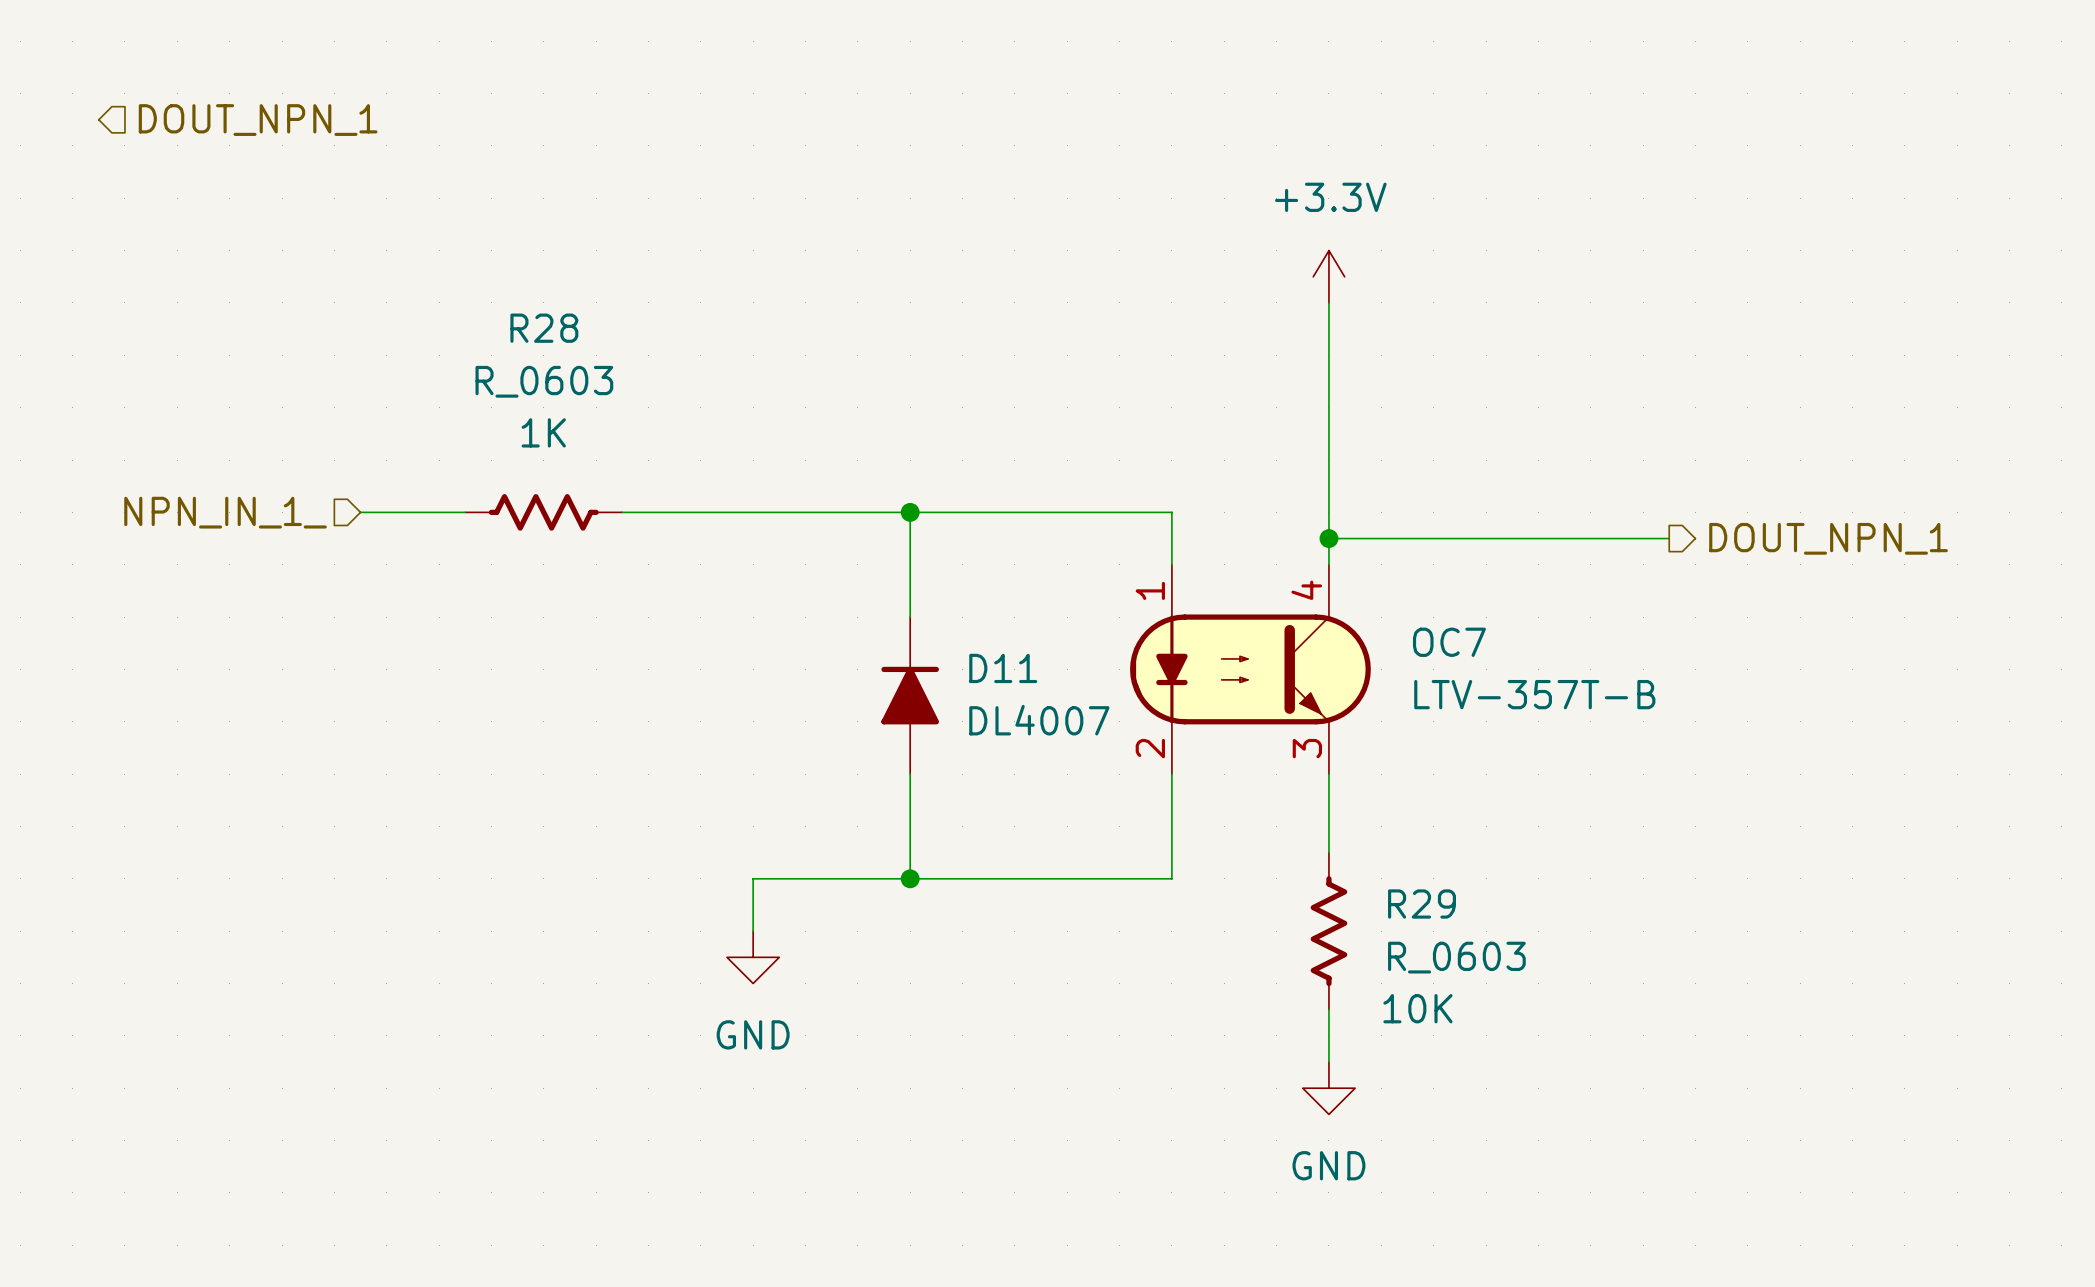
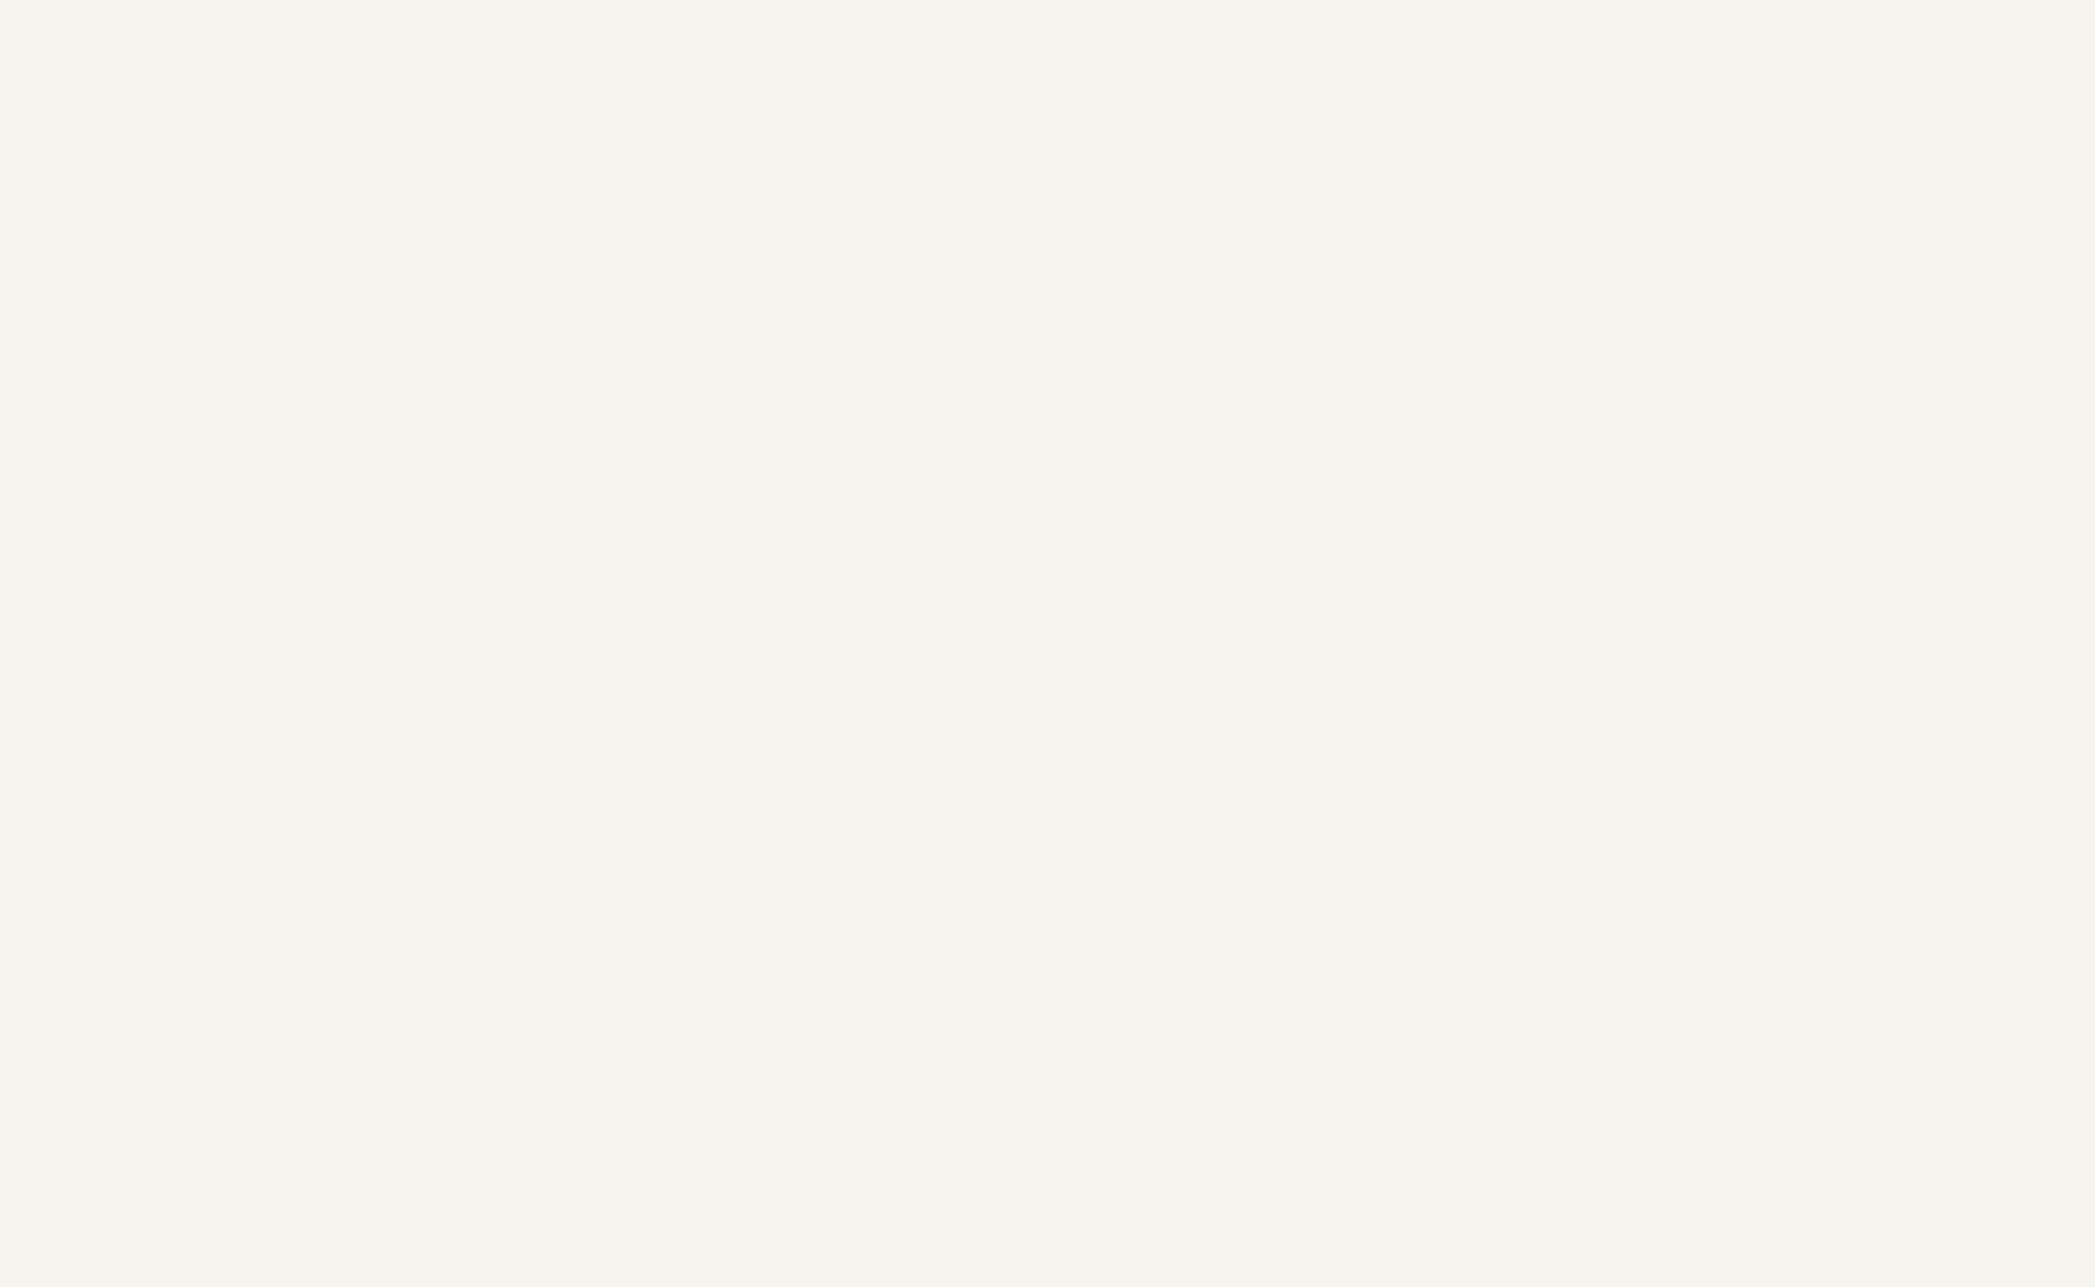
hierarchical label: DOUT_NPN_1 (258, 120) -> none
power symbol: +3.3V (1328, 276) -> none
wire: (1328, 302) (1328, 564) -> none
hierarchical label: NPN_IN_1_ (225, 512) -> none
wire: (360, 512) (465, 512) -> none
R28: R_0603 (543, 512) -> none
wire: (622, 512) (1171, 512) (1171, 564) -> none
wire: (910, 512) (910, 617) -> none
junction: (910, 512) -> none
wire: (1328, 538) (1669, 538) -> none
junction: (1328, 538) -> none
hierarchical label: DOUT_NPN_1 (1828, 538) -> none
OC7: LTV-357T-B (1250, 669) -> none
D11: DL4007 (910, 695) -> none
wire: (910, 774) (910, 878) -> none
wire: (1171, 774) (1171, 878) (753, 878) (753, 931) -> none
wire: (1328, 774) (1328, 852) -> none
junction: (910, 878) -> none
R29: R_0603 (1328, 931) -> none
power symbol: GND (753, 957) -> none
wire: (1328, 1009) (1328, 1062) -> none
power symbol: GND (1328, 1088) -> none

